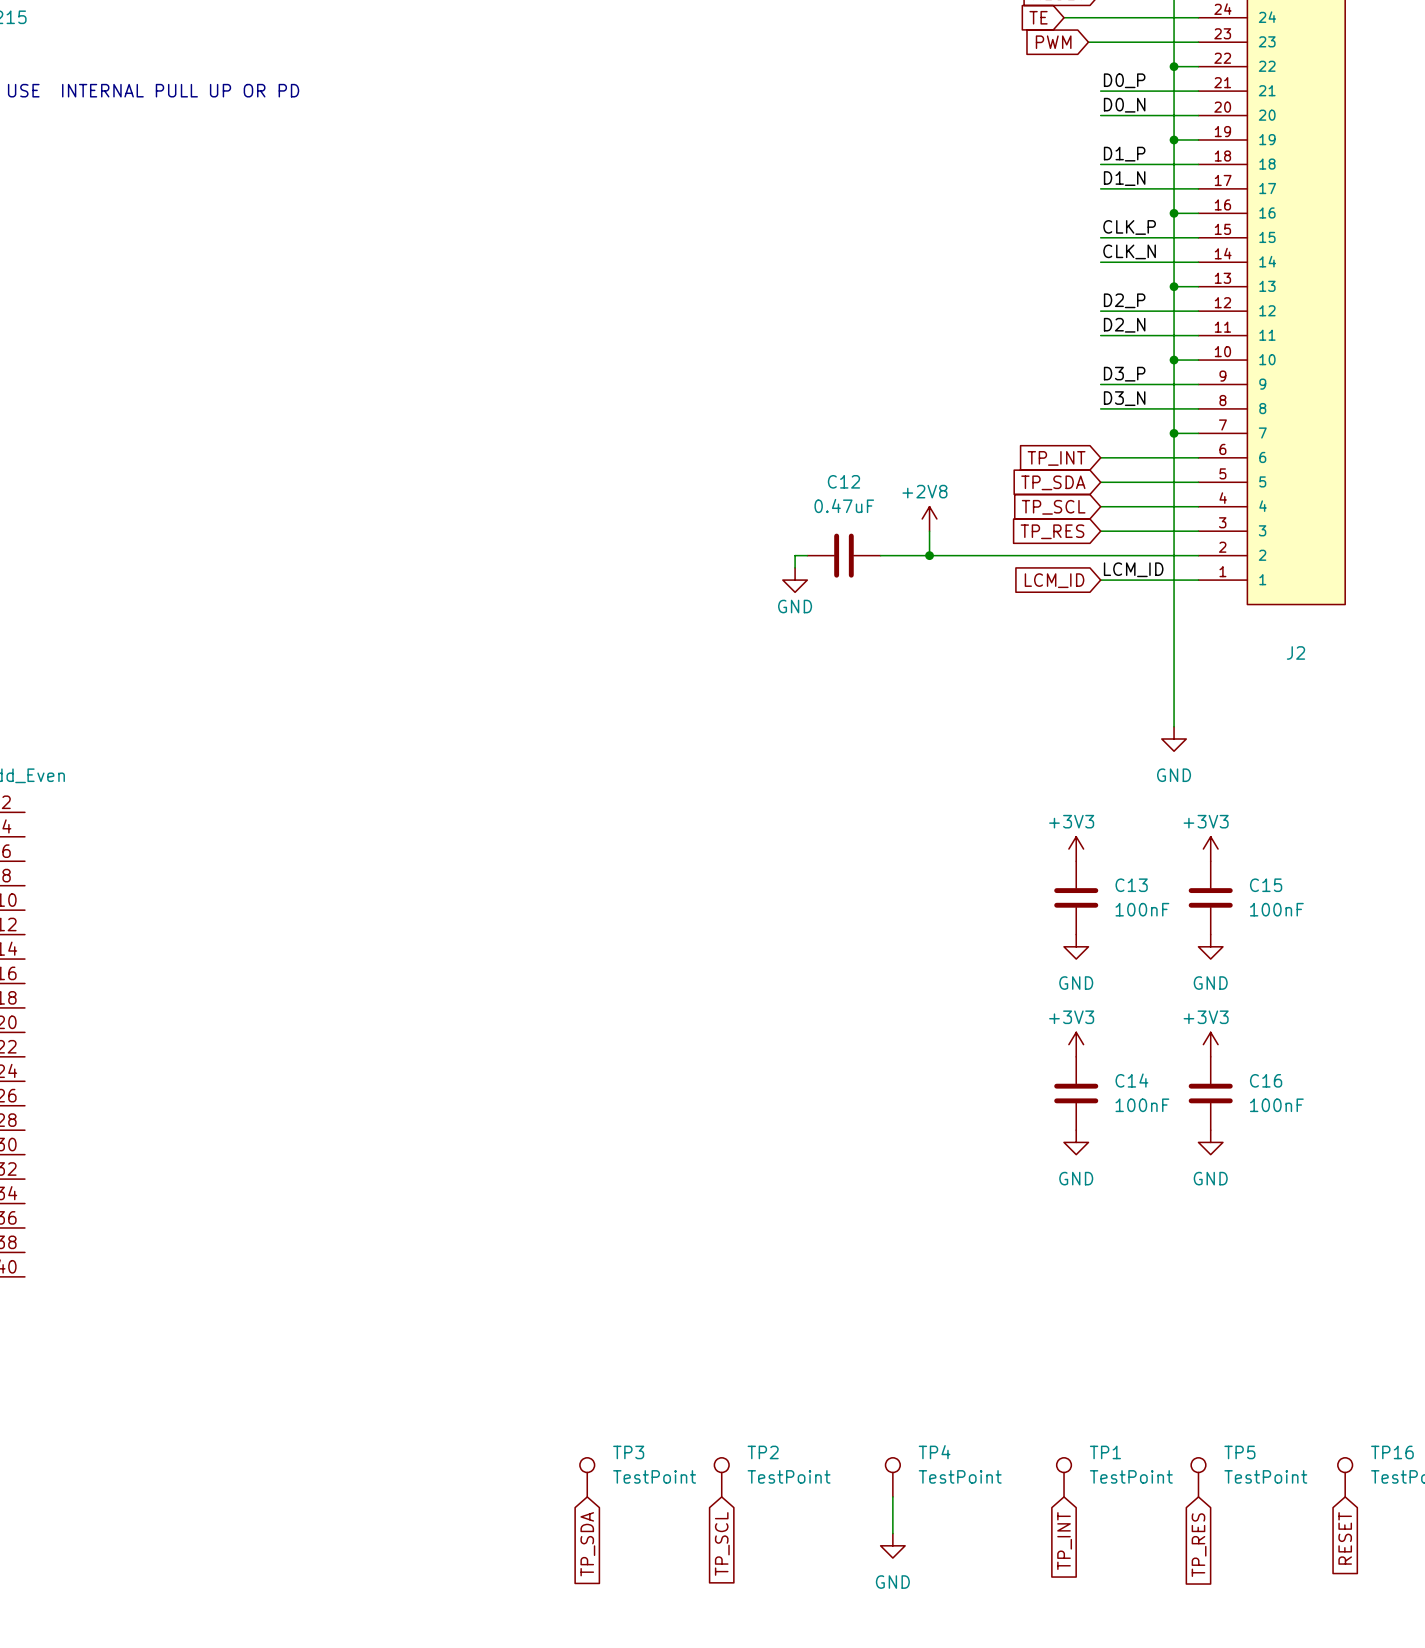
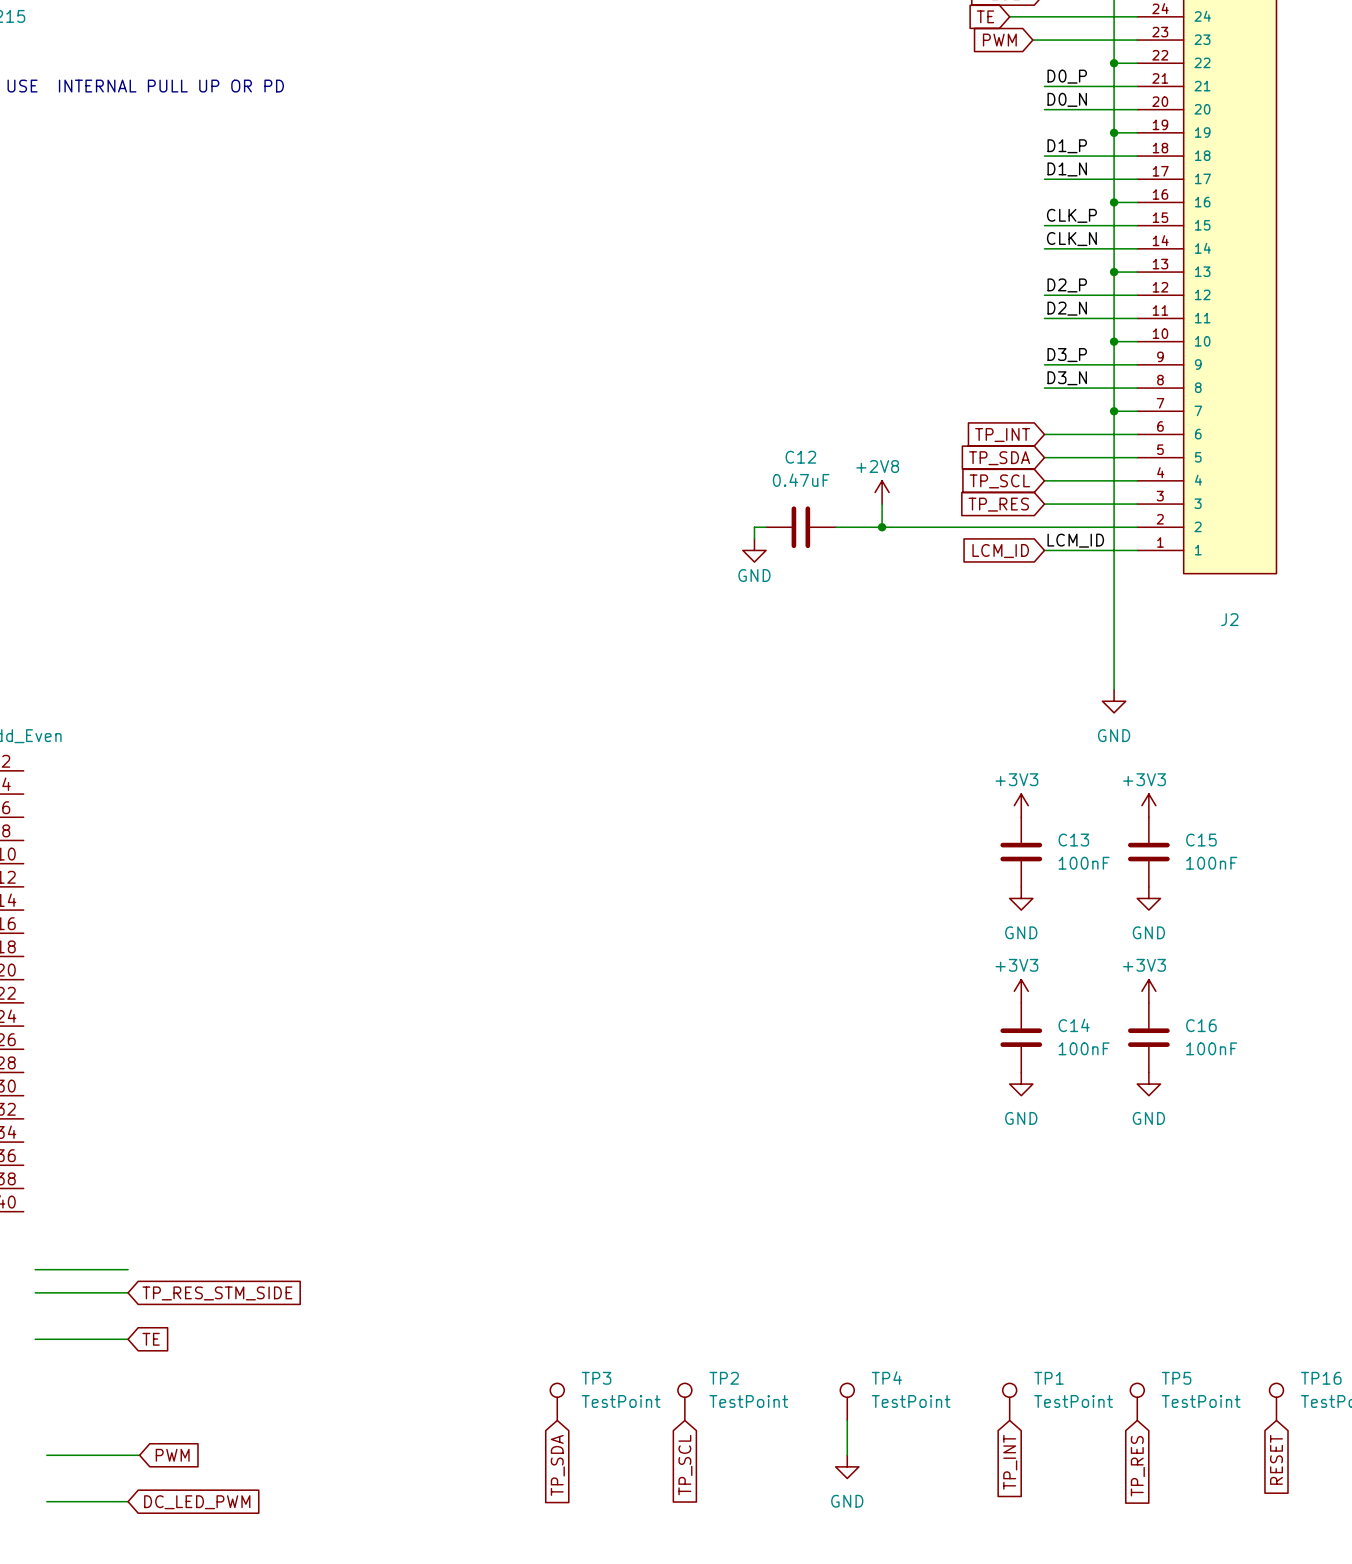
wire: none -> (35, 1269) (128, 1269)
wire: none -> (35, 1292) (128, 1292)
global label: none -> TP_RES_STM_SIDE (217, 1293)
wire: none -> (35, 1339) (128, 1339)
global label: none -> TE (151, 1339)
wire: none -> (46, 1455) (139, 1455)
global label: none -> PWM (172, 1455)
wire: none -> (46, 1501) (128, 1501)
global label: none -> DC_LED_PWM (197, 1502)

